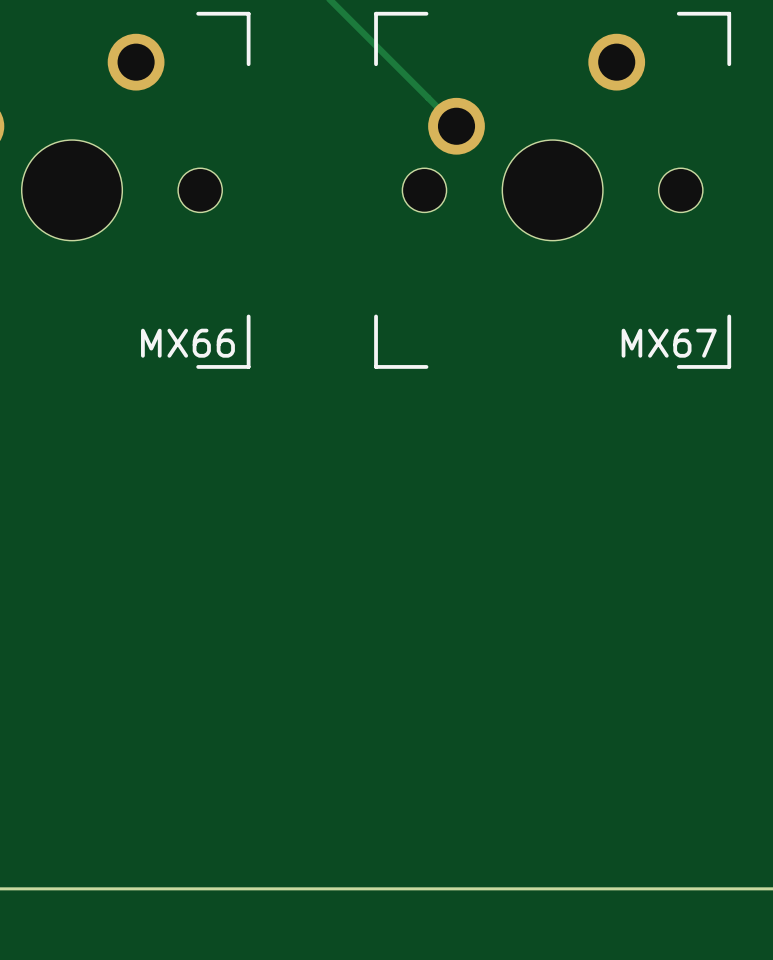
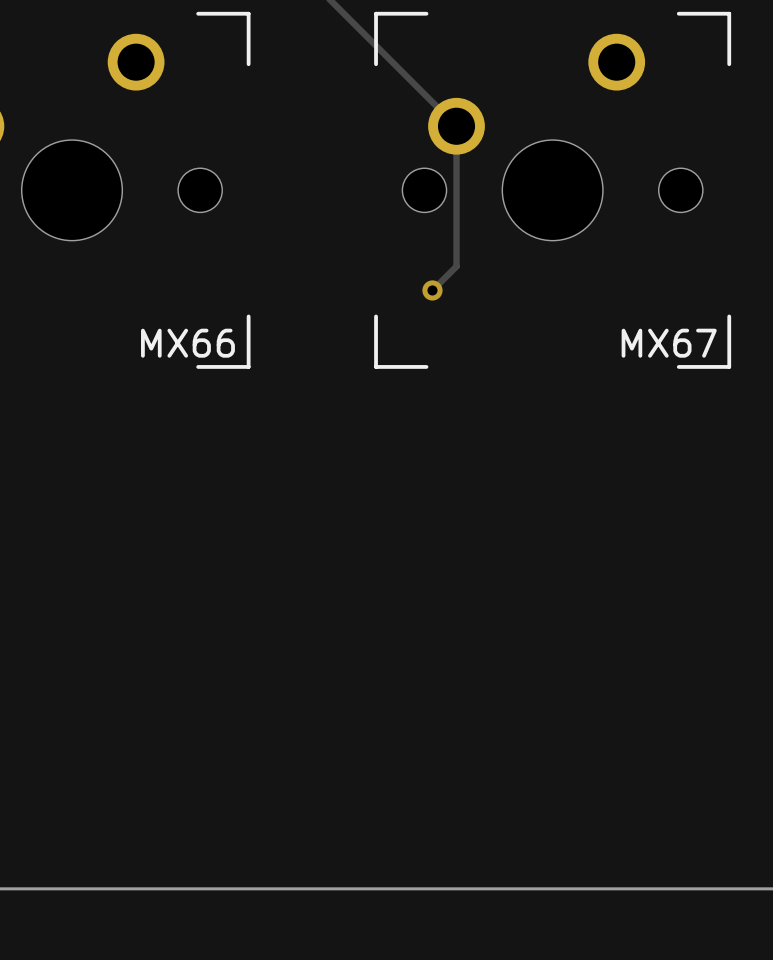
track: none -> (456, 126) (456, 266) (432, 290)
via: none -> (432, 290)

